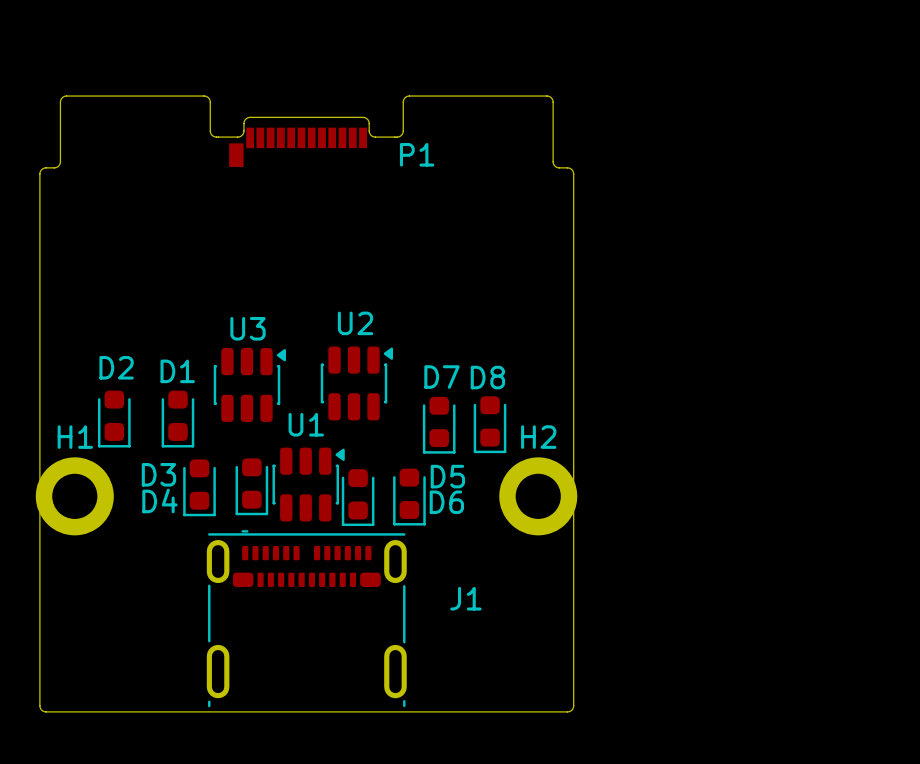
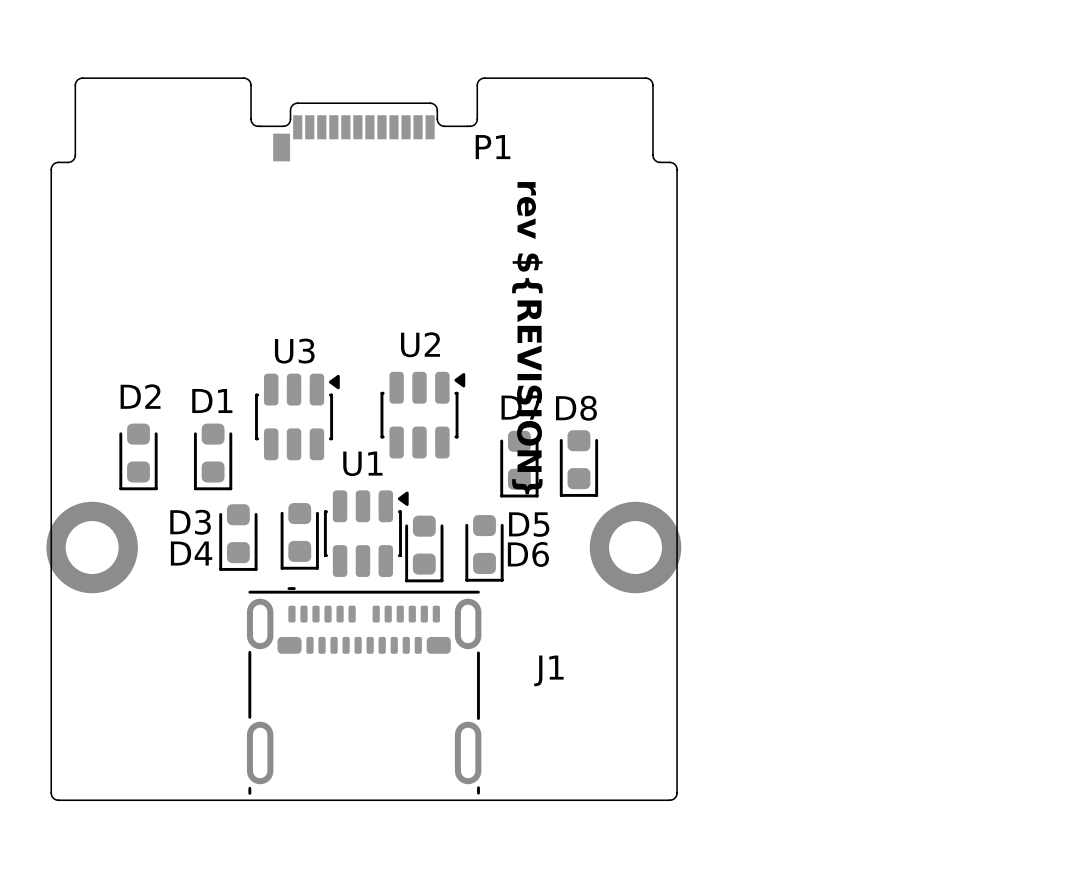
text: none -> rev ${REVISION} (527, 338)
H1 name: H1 (75, 437) -> none
H2 name: H2 (538, 437) -> none

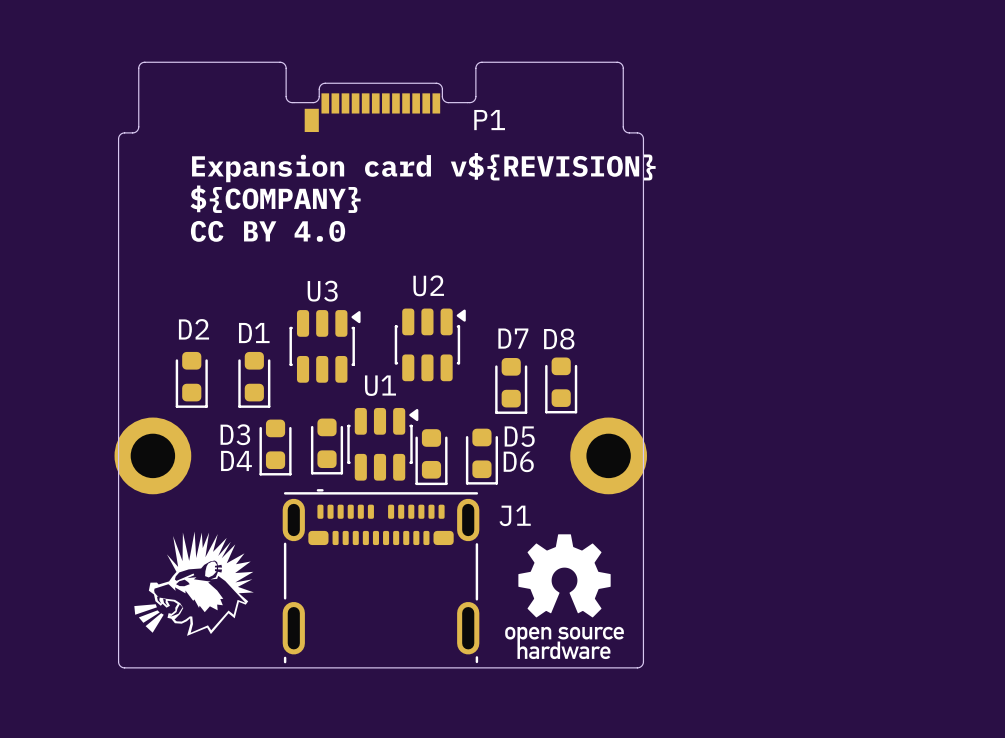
text: none -> ${COMPANY} (275, 199)
text: none -> CC BY 4.0 (268, 231)
text: rev ${REVISION} (527, 338) -> Expansion card v${REVISION} (423, 167)
drawing: none -> [134, 531, 254, 636]
drawing: none -> [505, 534, 624, 660]
J1 name position: J1 (548, 670) -> J1 (515, 515)

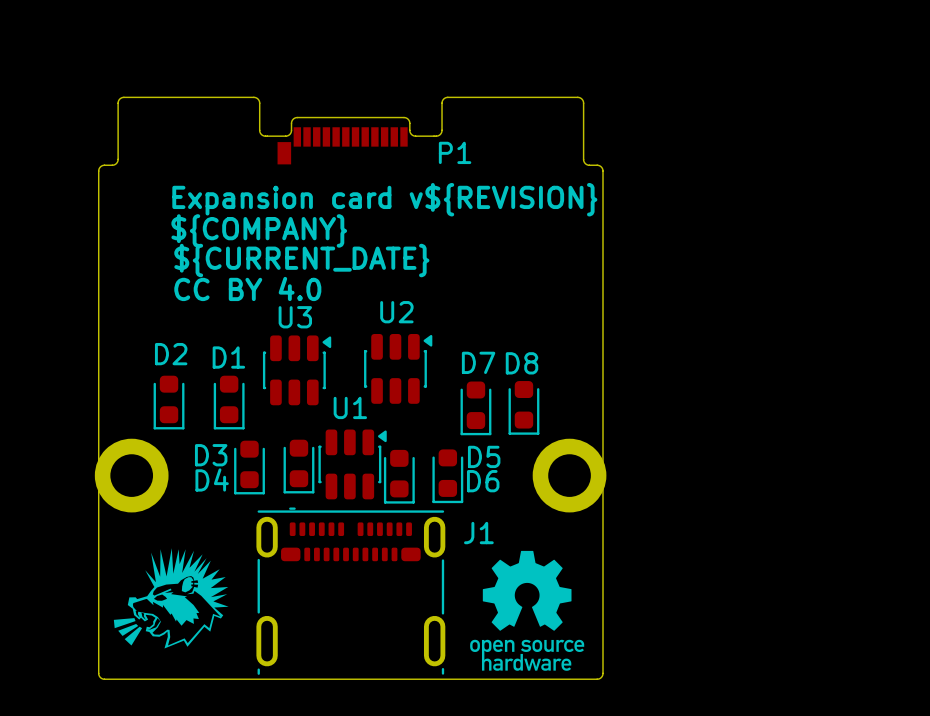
text: CC BY 4.0 (268, 231) -> ${CURRENT_DATE} (301, 260)
text: none -> CC BY 4.0 (247, 288)

